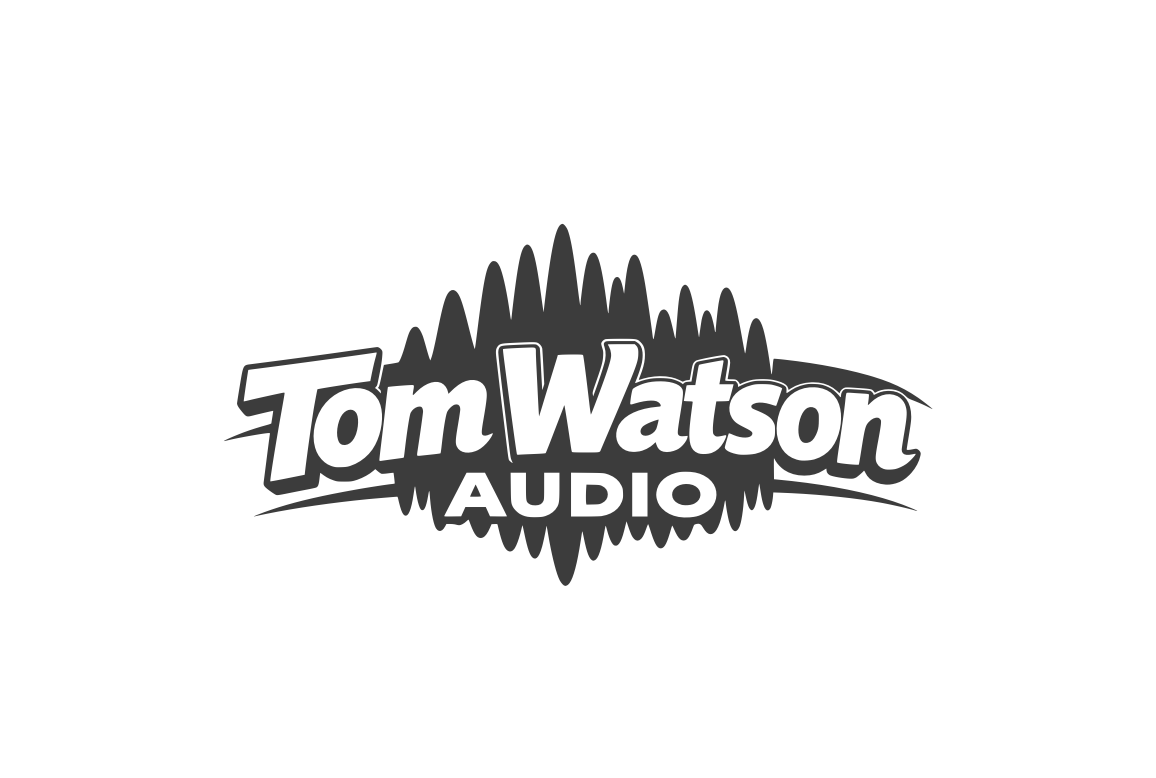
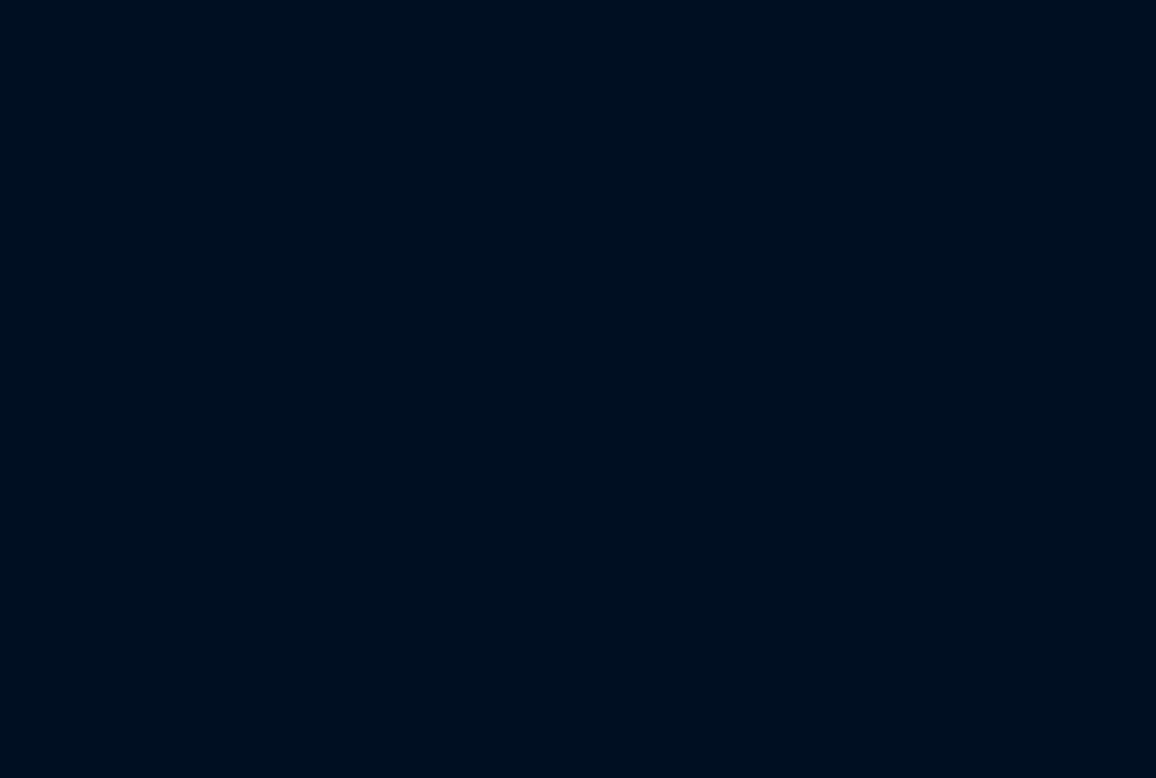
drawing: [223, 223, 933, 586] -> none

